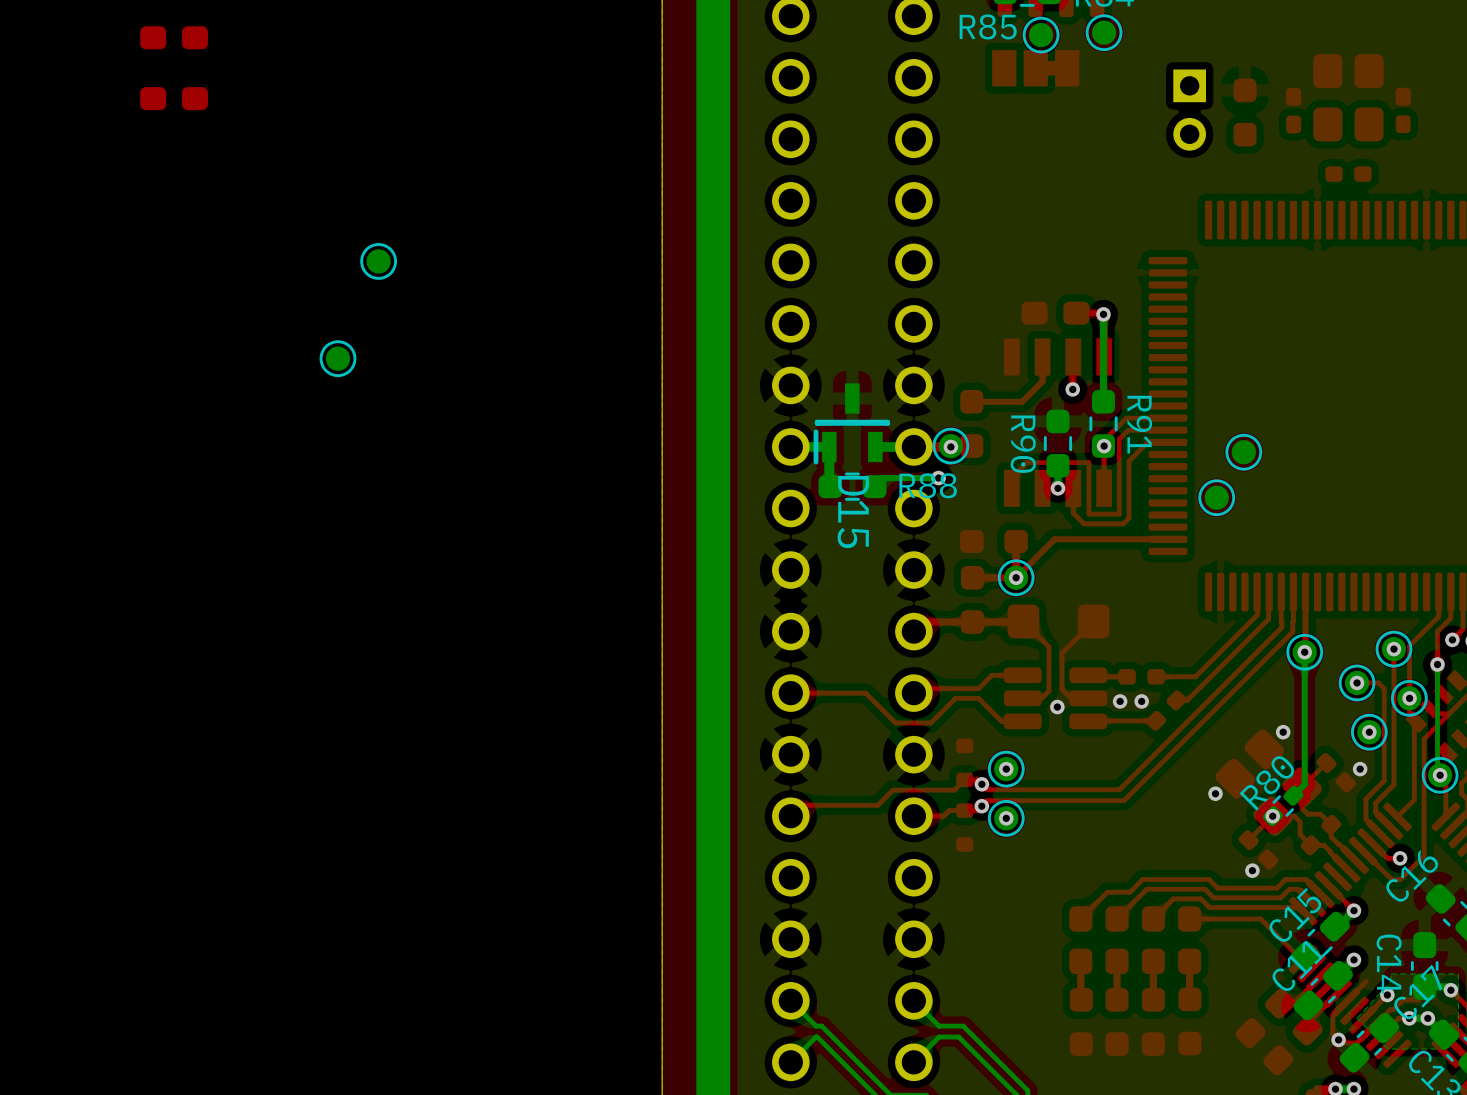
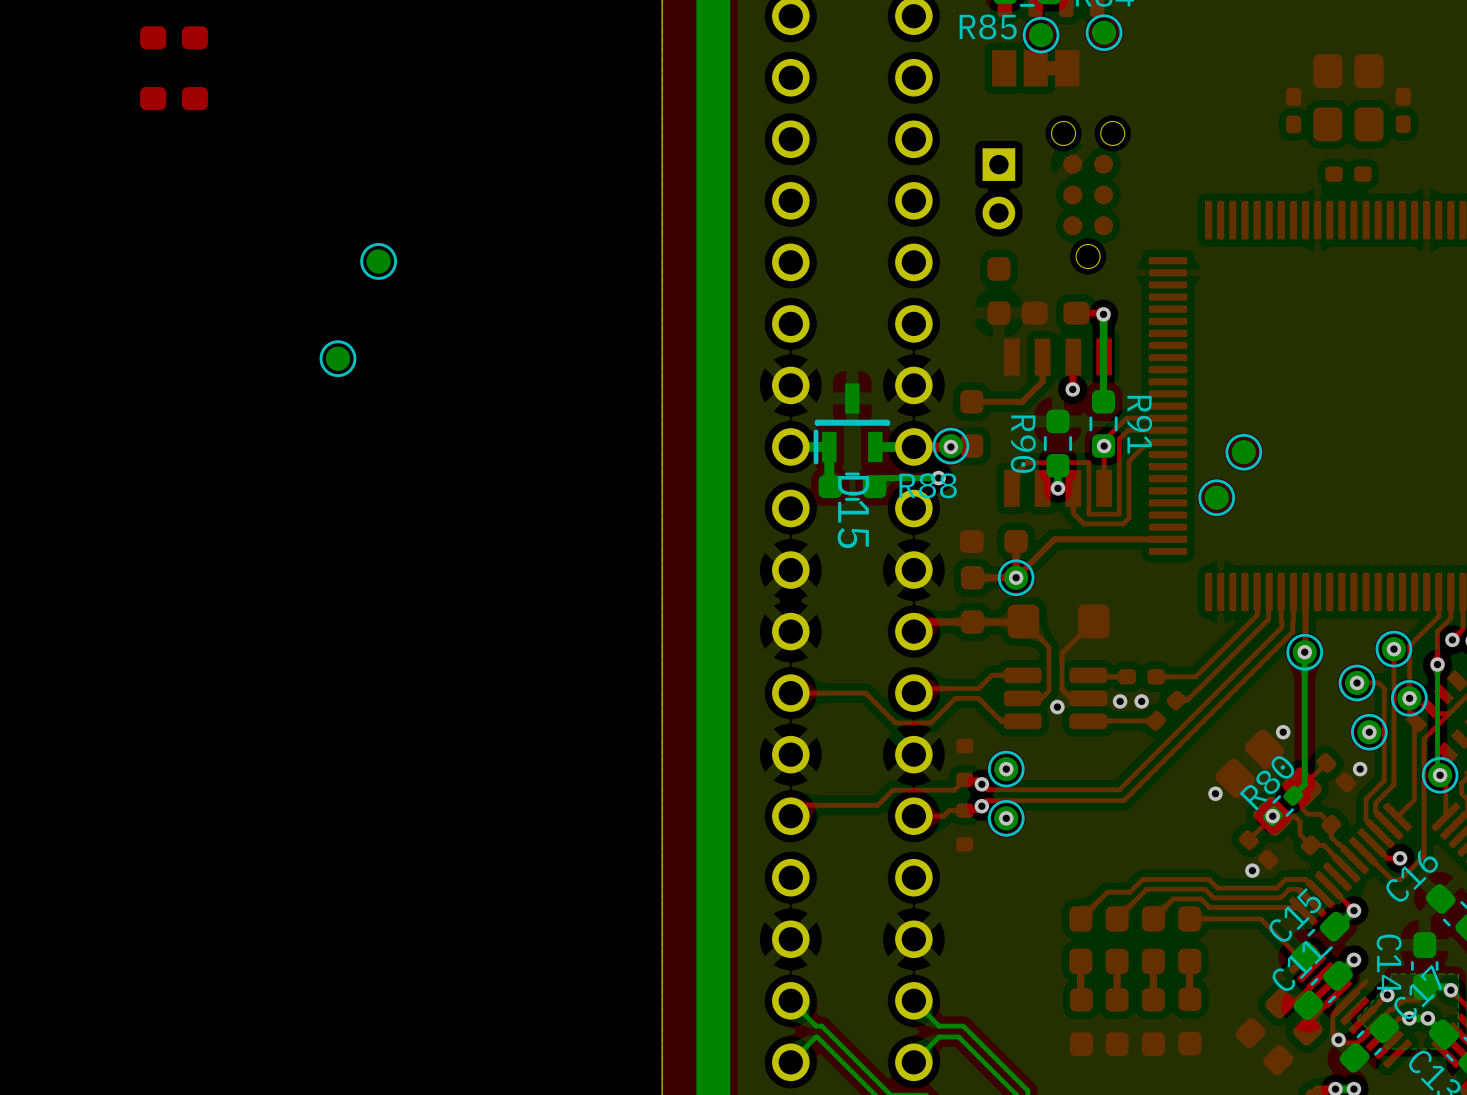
part position: (1189, 110) -> (998, 188)
part position: (1245, 112) -> (998, 290)
part: none -> (1088, 194)

